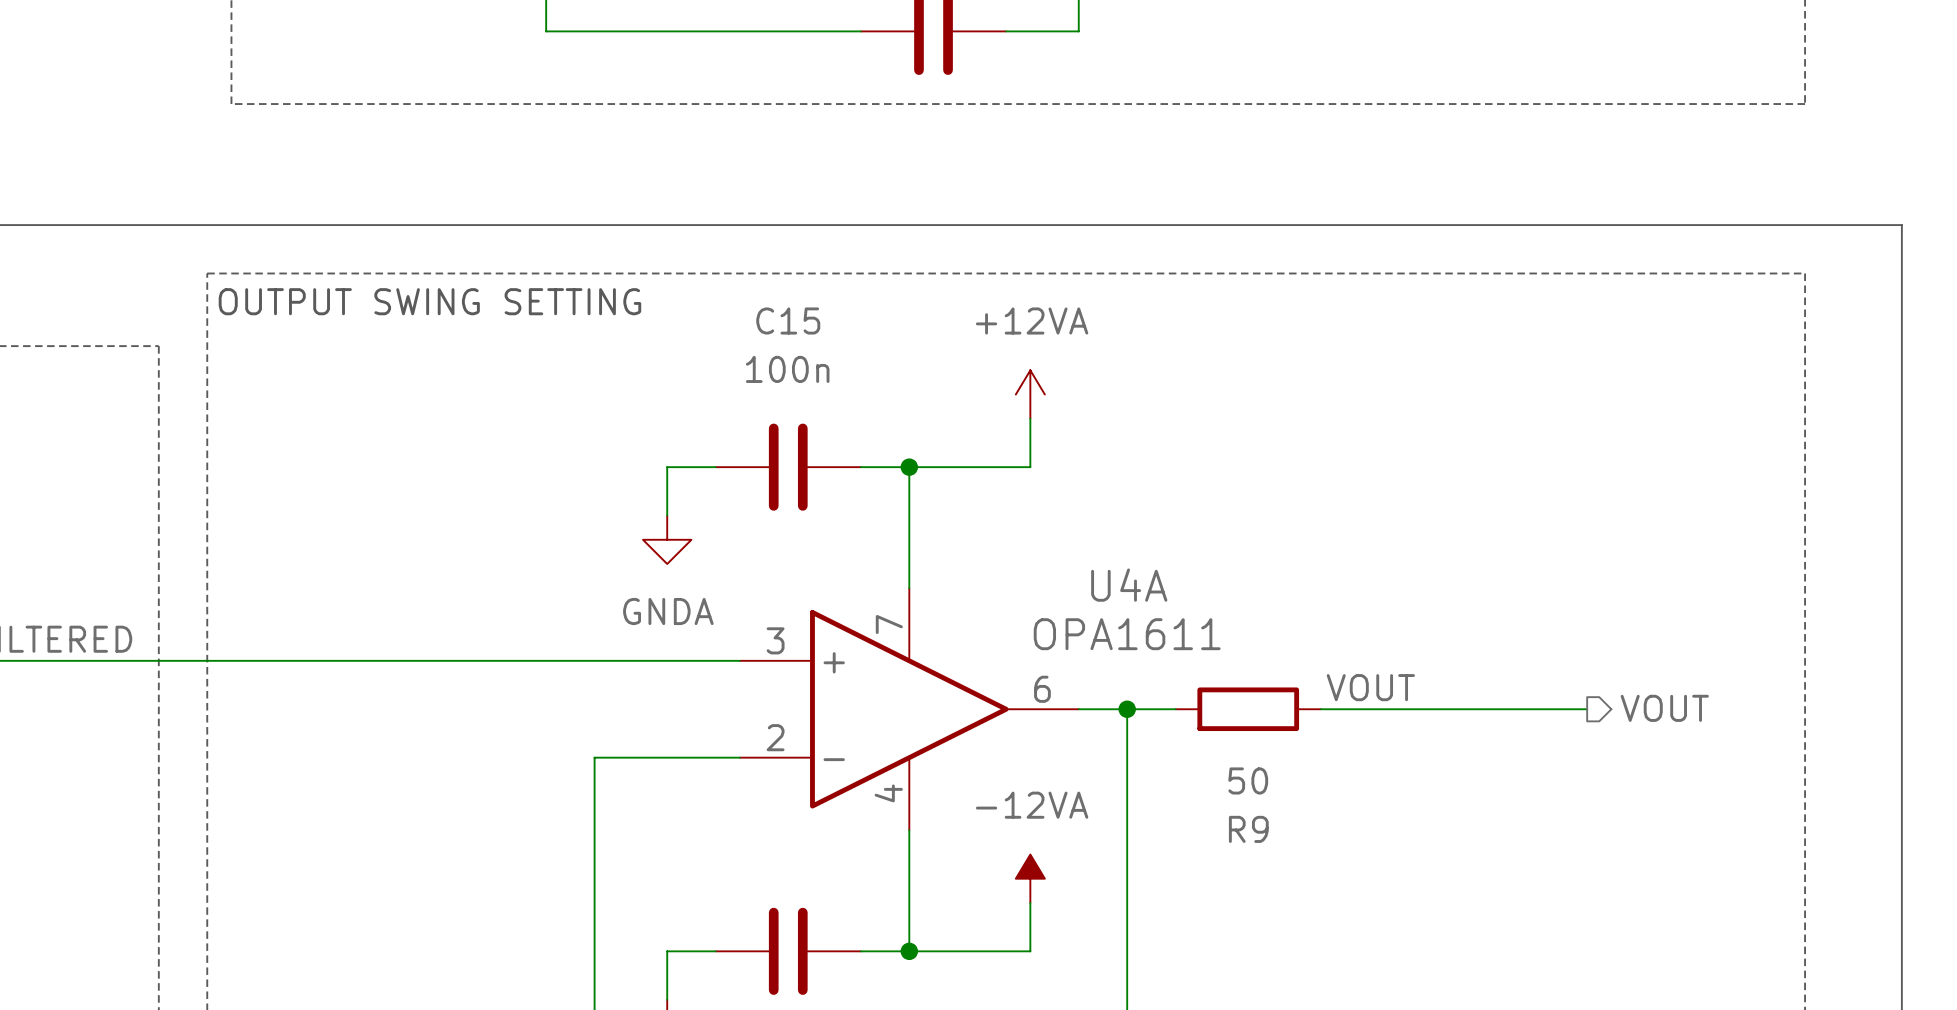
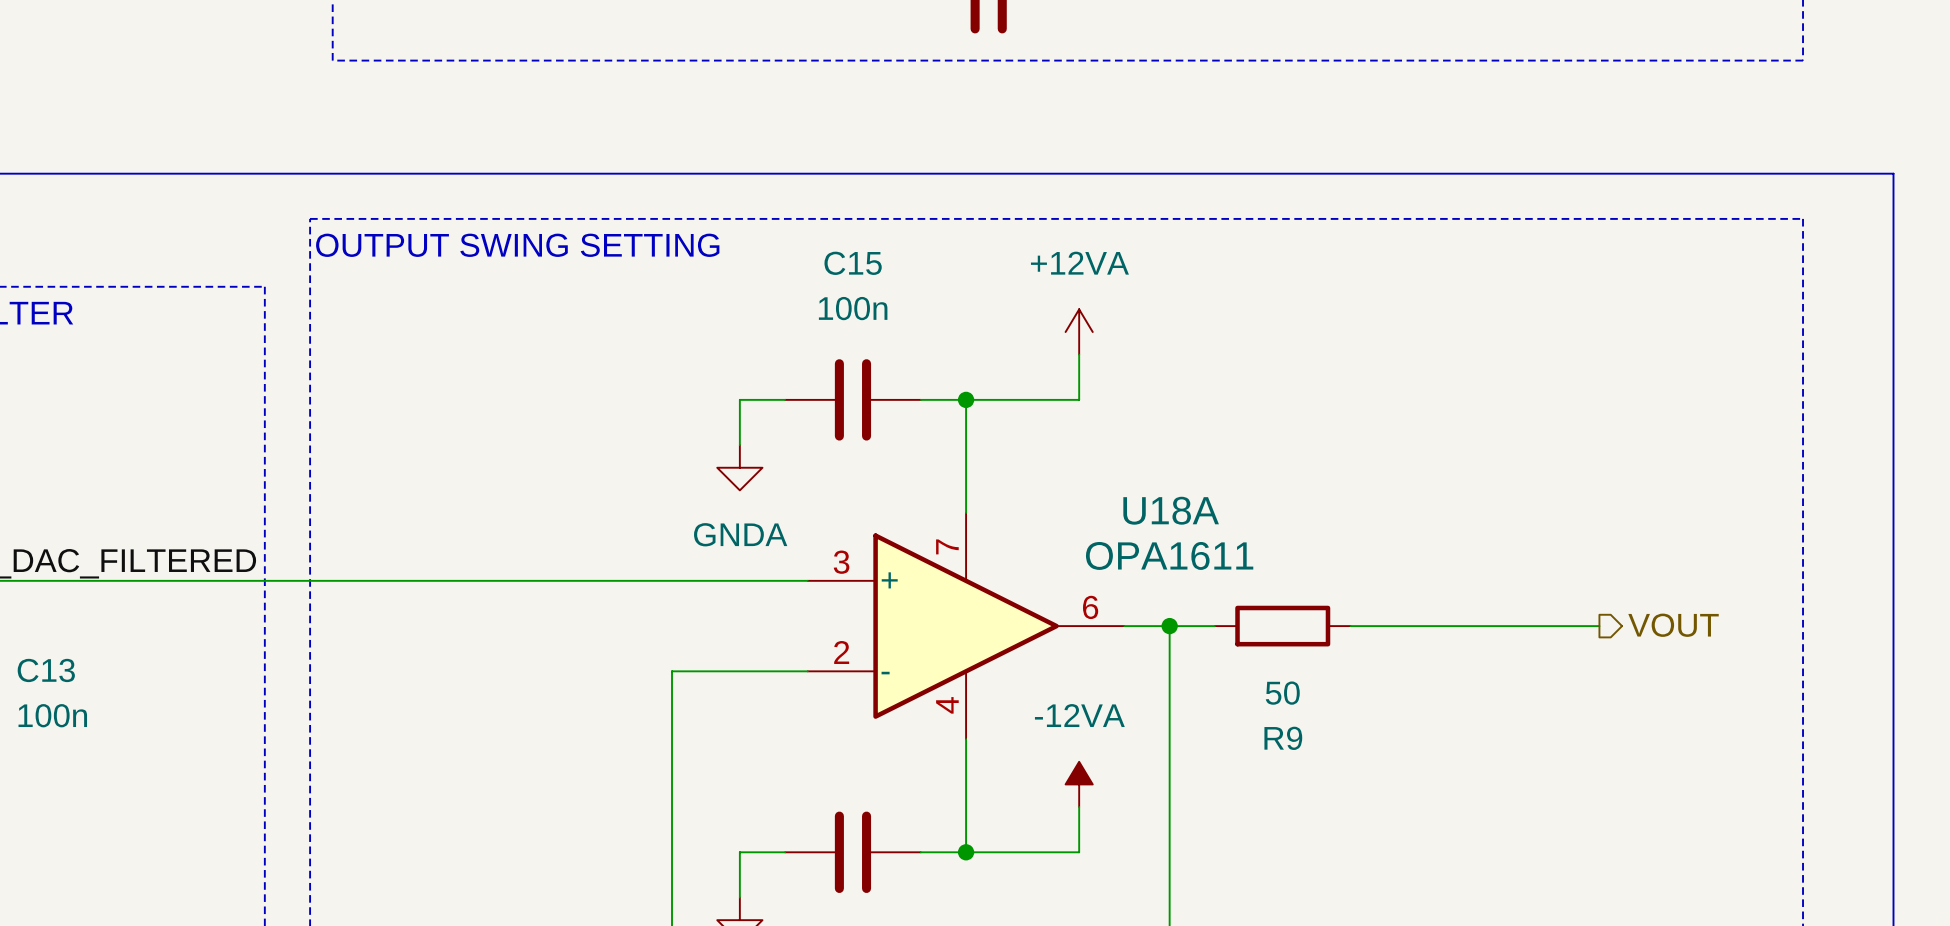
U4A name: U4A (1129, 585) -> U18A (1171, 510)
label: VOUT (1370, 687) -> none

